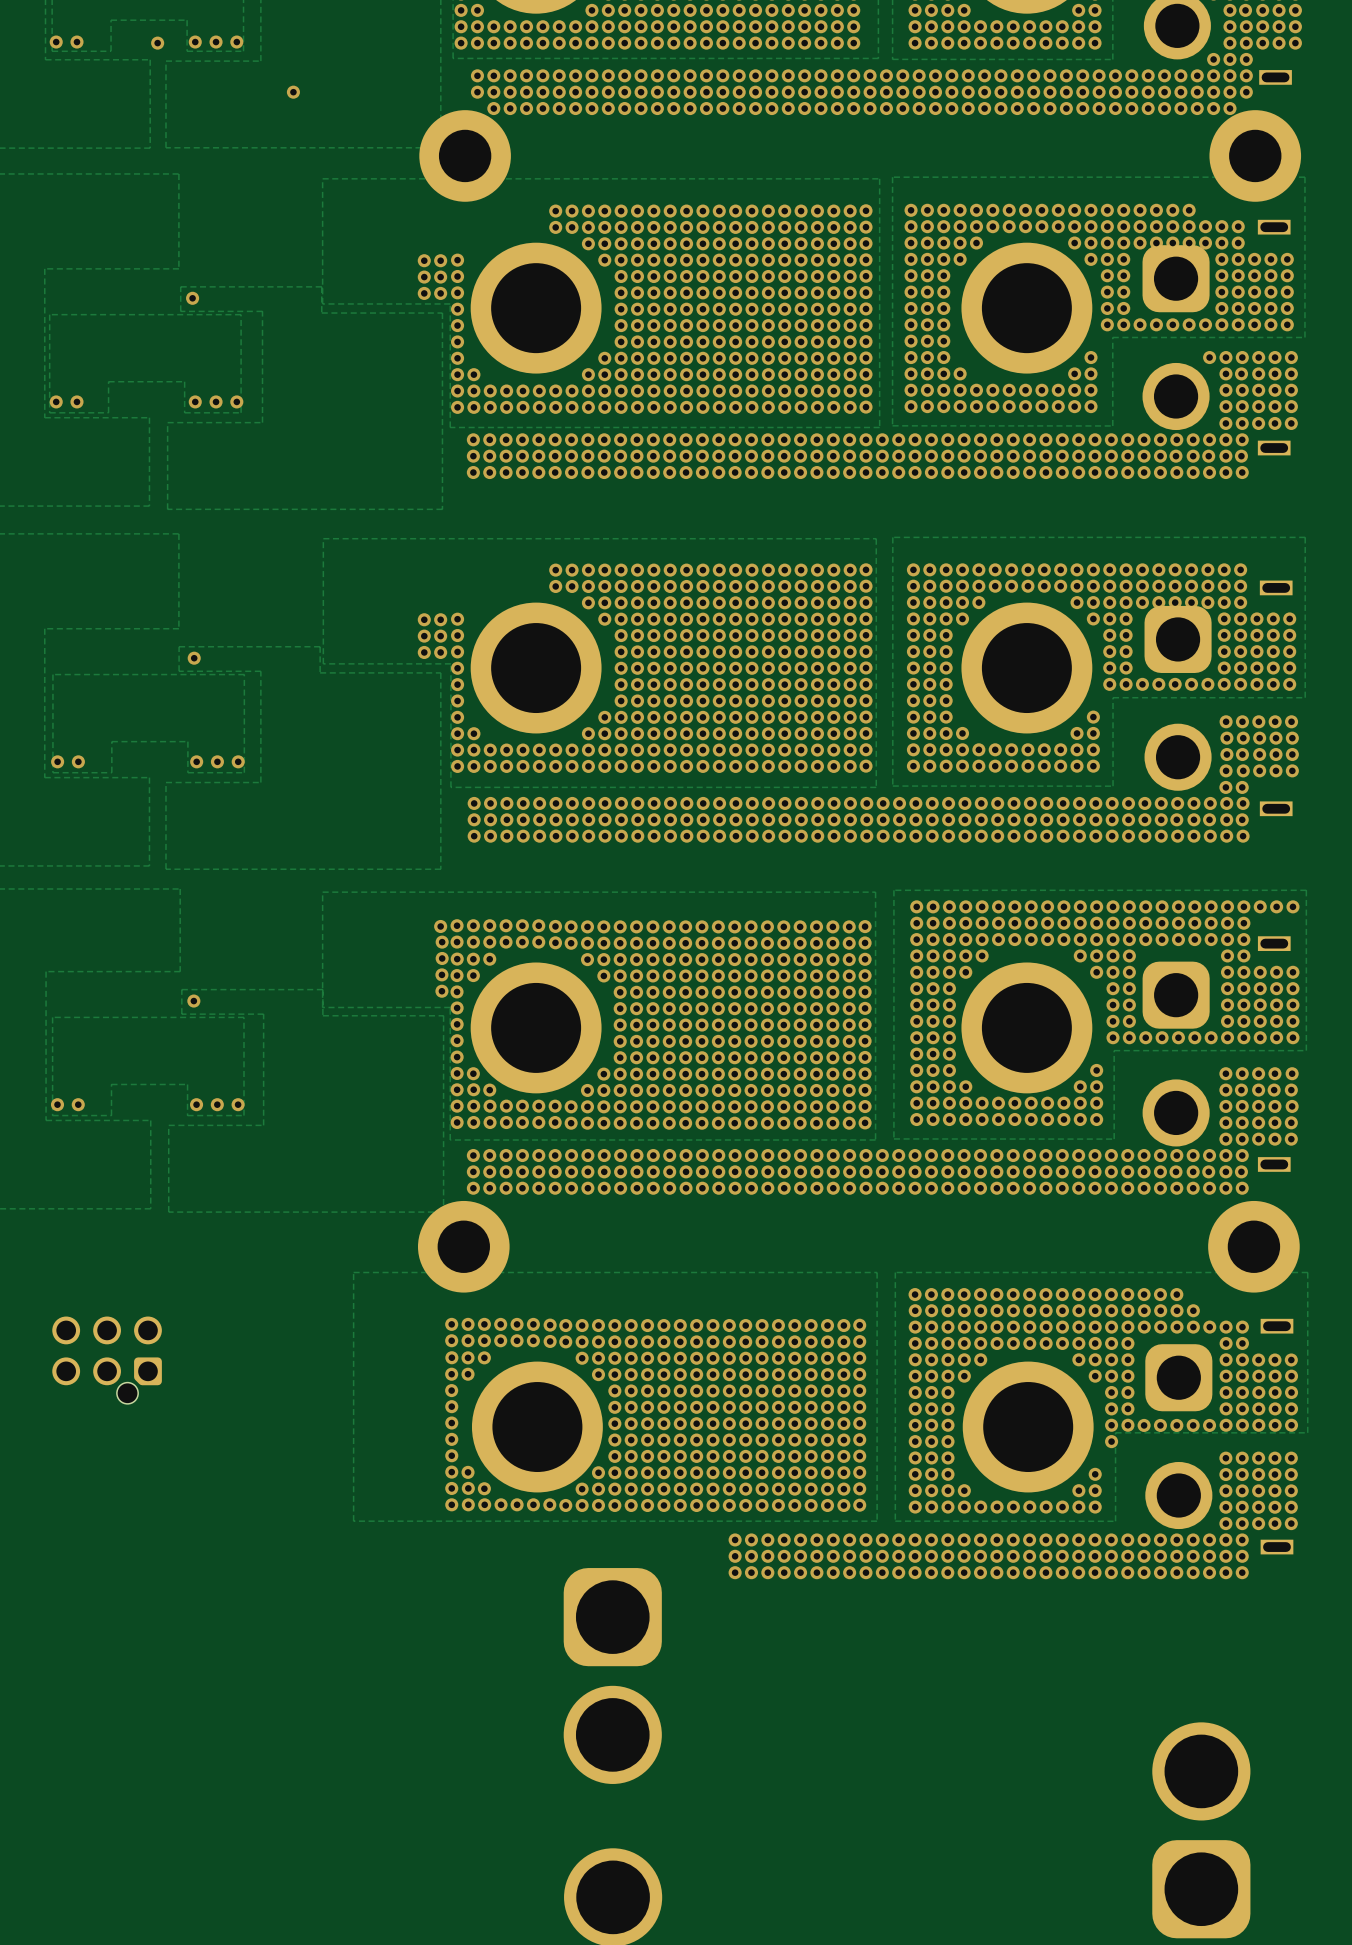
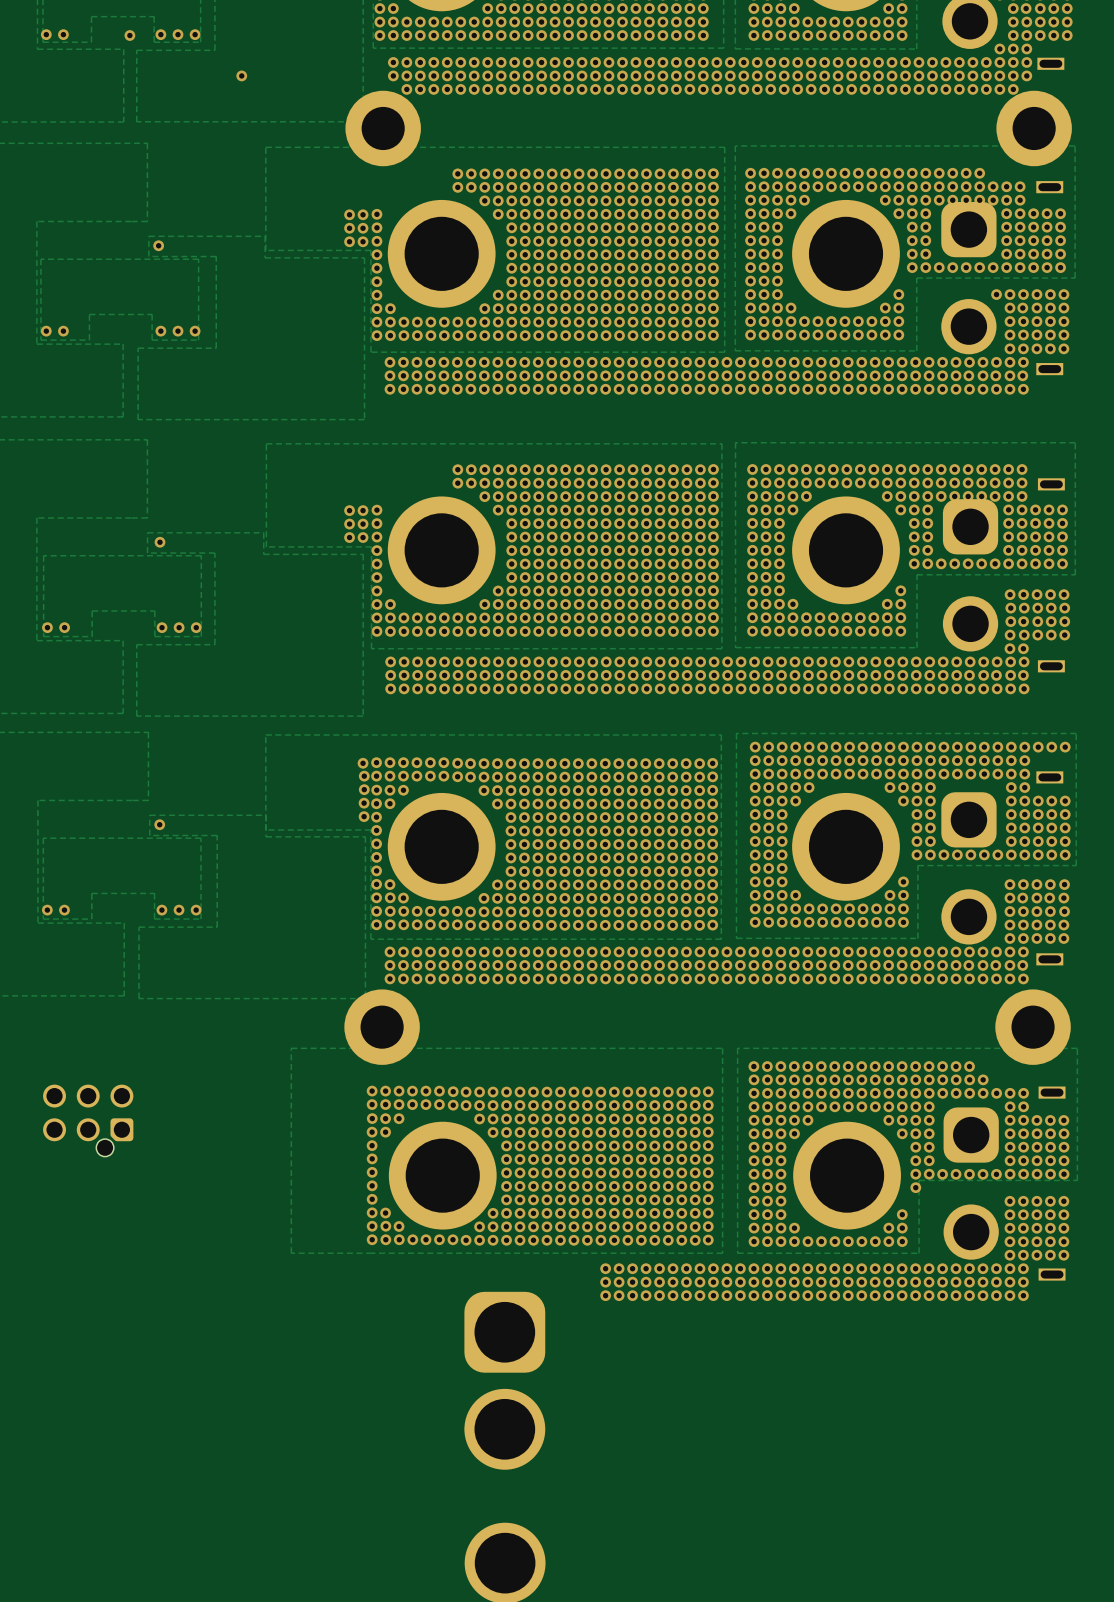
part: (1201, 1830) -> none

